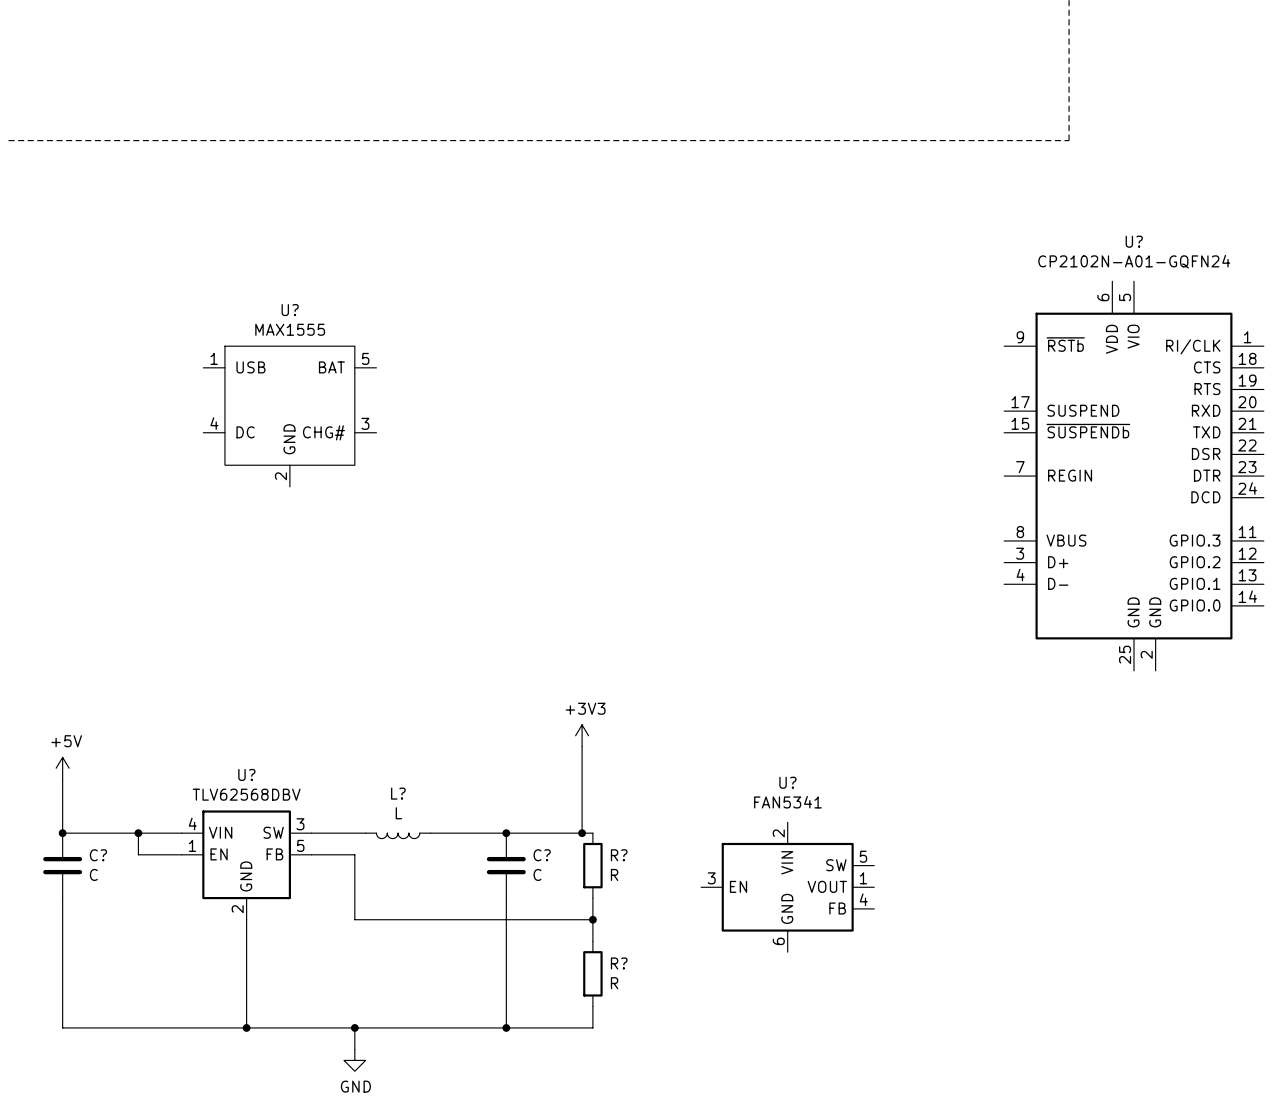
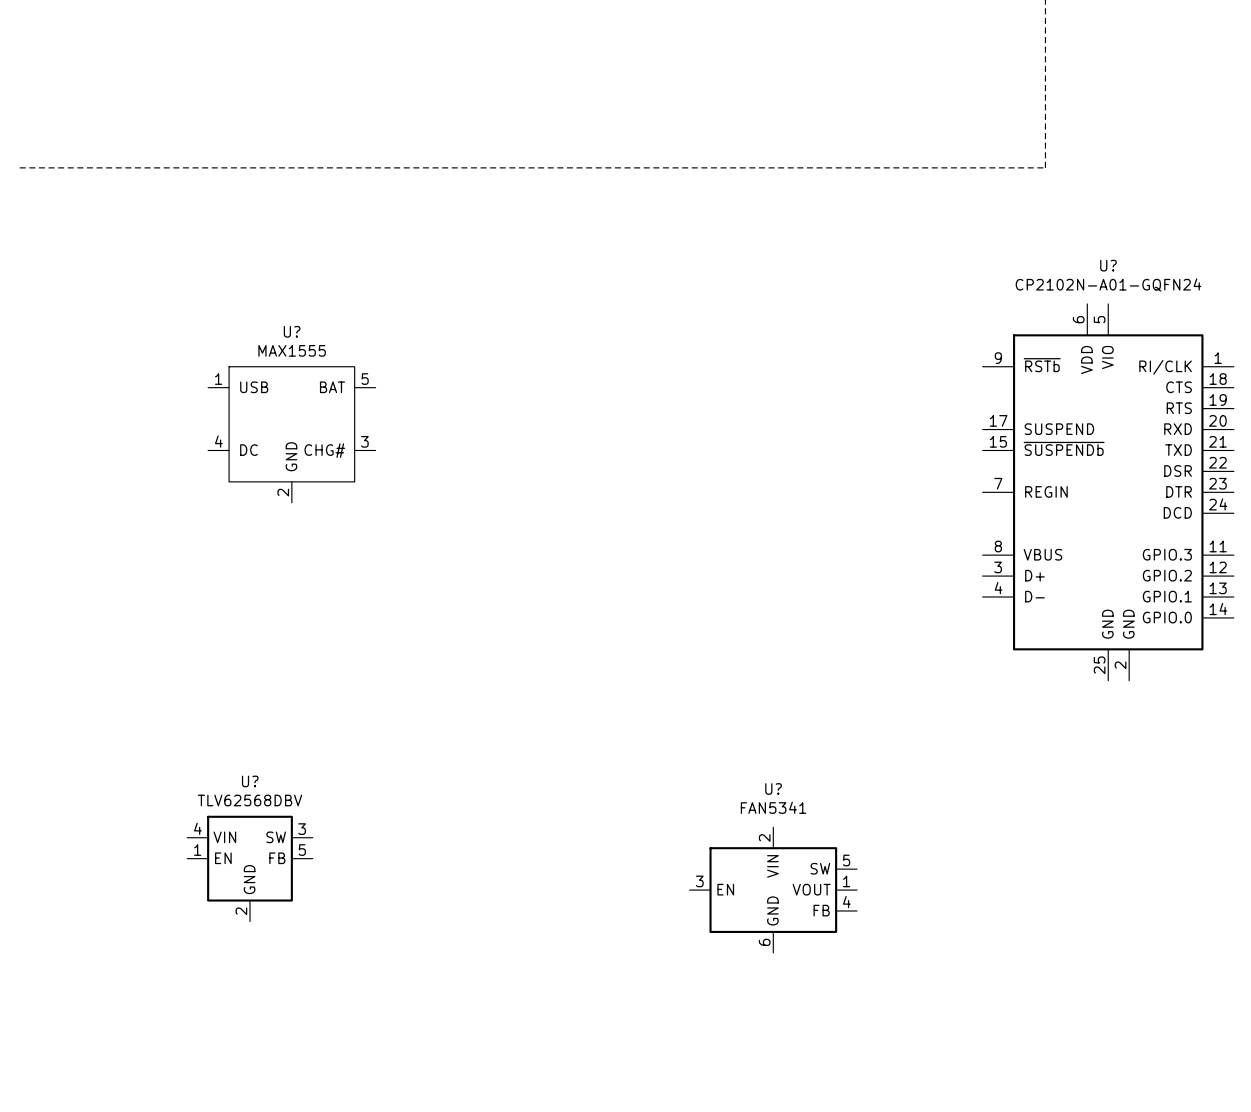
power symbol: +3V3 (582, 735) -> none
wire: (582, 746) (582, 833) -> none
power symbol: +5V (62, 768) -> none
wire: (62, 779) (62, 833) (181, 833) -> none
junction: (62, 833) -> none
wire: (138, 833) (138, 854) (181, 854) -> none
junction: (138, 833) -> none
wire: (311, 833) (365, 833) -> none
wire: (430, 833) (592, 833) -> none
junction: (506, 833) -> none
junction: (582, 833) -> none
L?: L (398, 835) -> none
wire: (311, 854) (354, 854) (354, 919) (592, 919) -> none
C?: C (62, 865) -> none
C?: C (506, 865) -> none
R?: R (592, 865) -> none
wire: (62, 898) (62, 1027) (592, 1027) (592, 1006) -> none
wire: (506, 898) (506, 1027) -> none
wire: (592, 898) (592, 941) -> none
wire: (246, 919) (246, 1027) -> none
junction: (592, 919) -> none
R?: R (592, 973) -> none
junction: (246, 1027) -> none
wire: (354, 1027) (354, 1049) -> none
junction: (354, 1027) -> none
junction: (506, 1027) -> none
power symbol: GND (354, 1060) -> none

